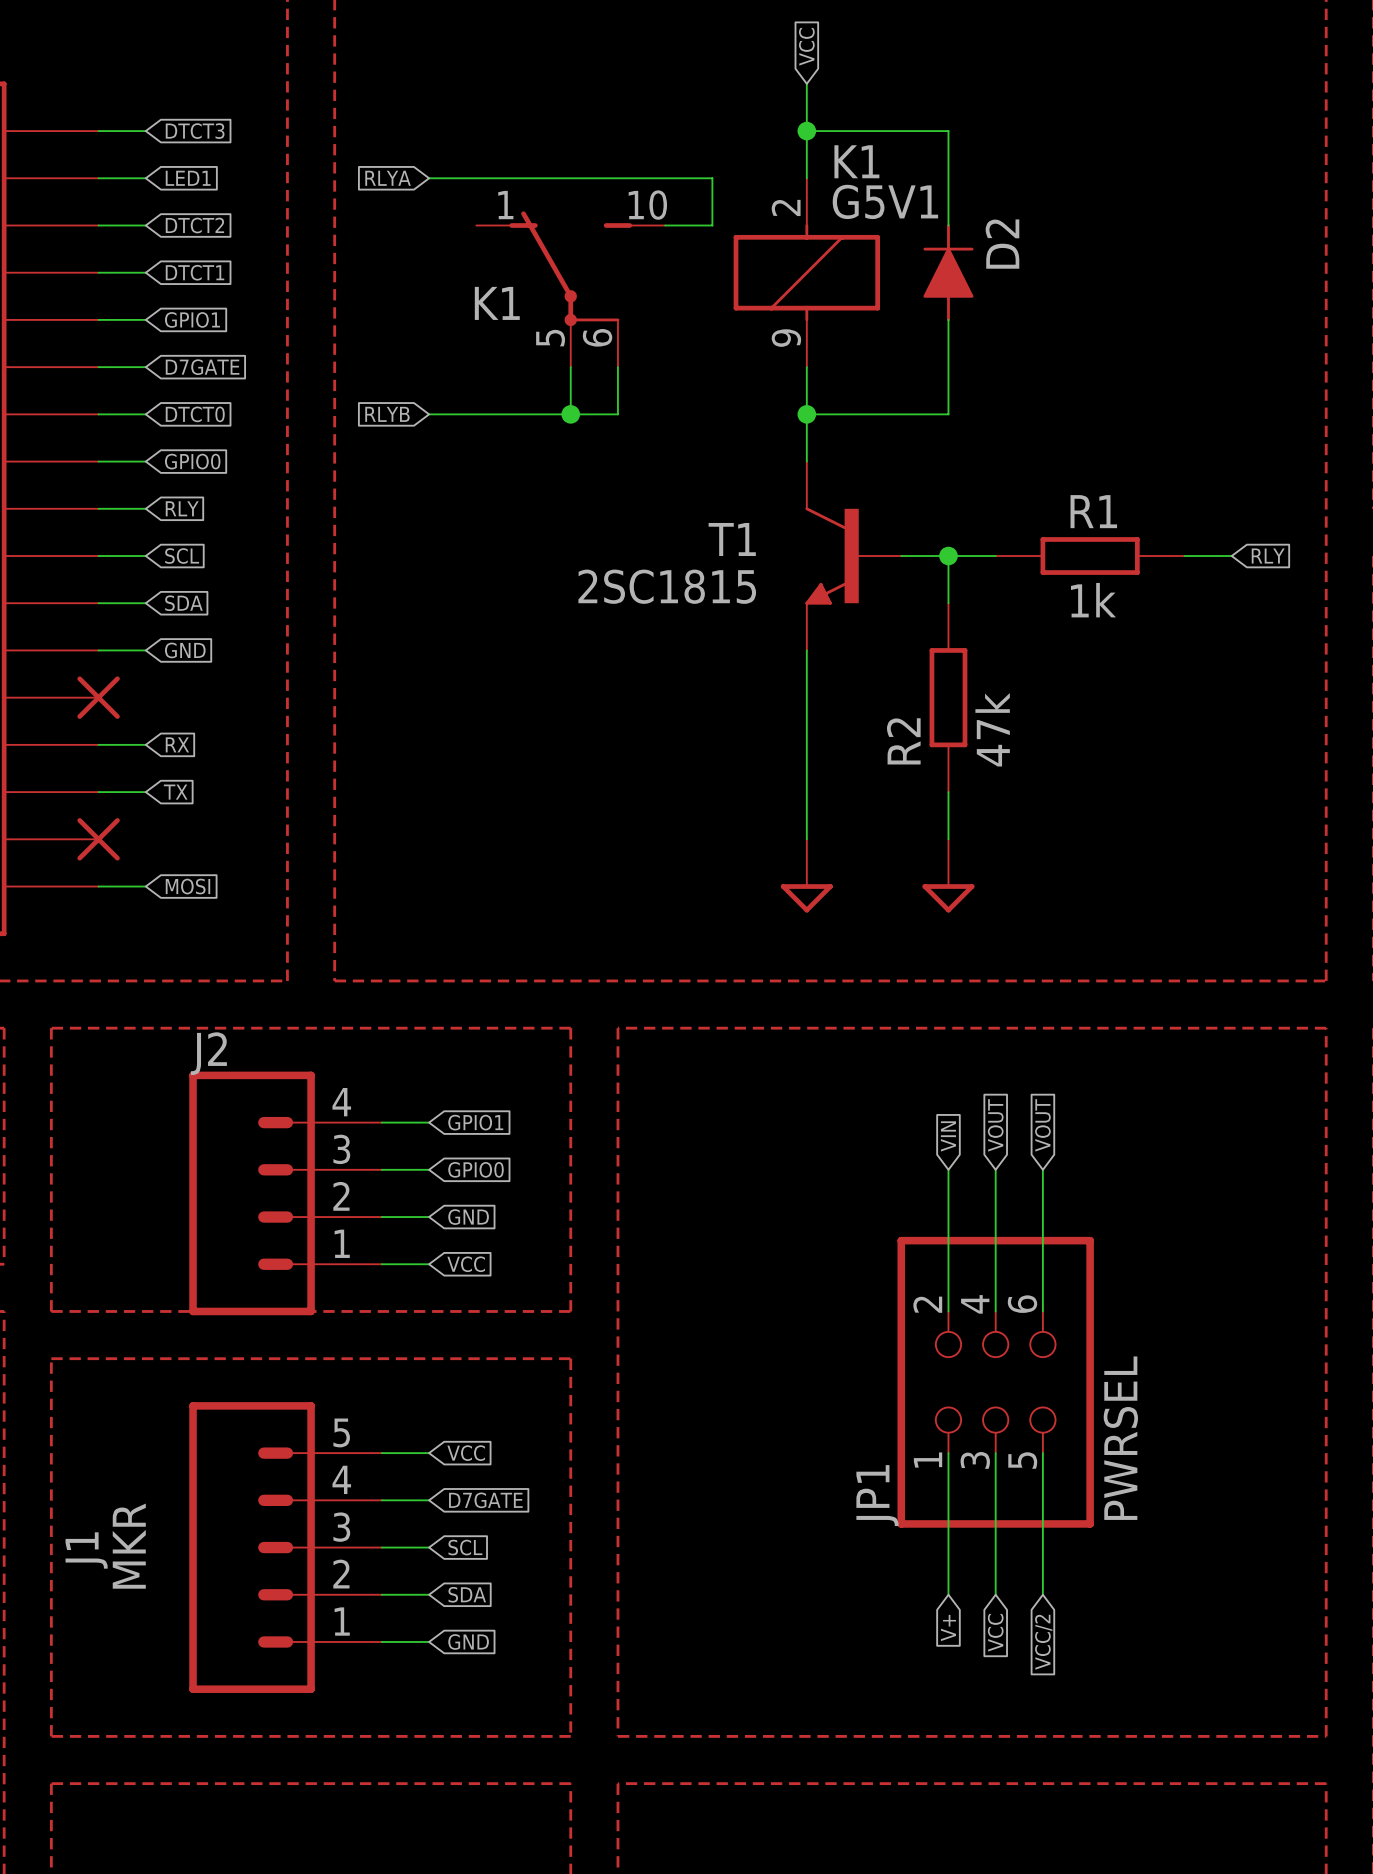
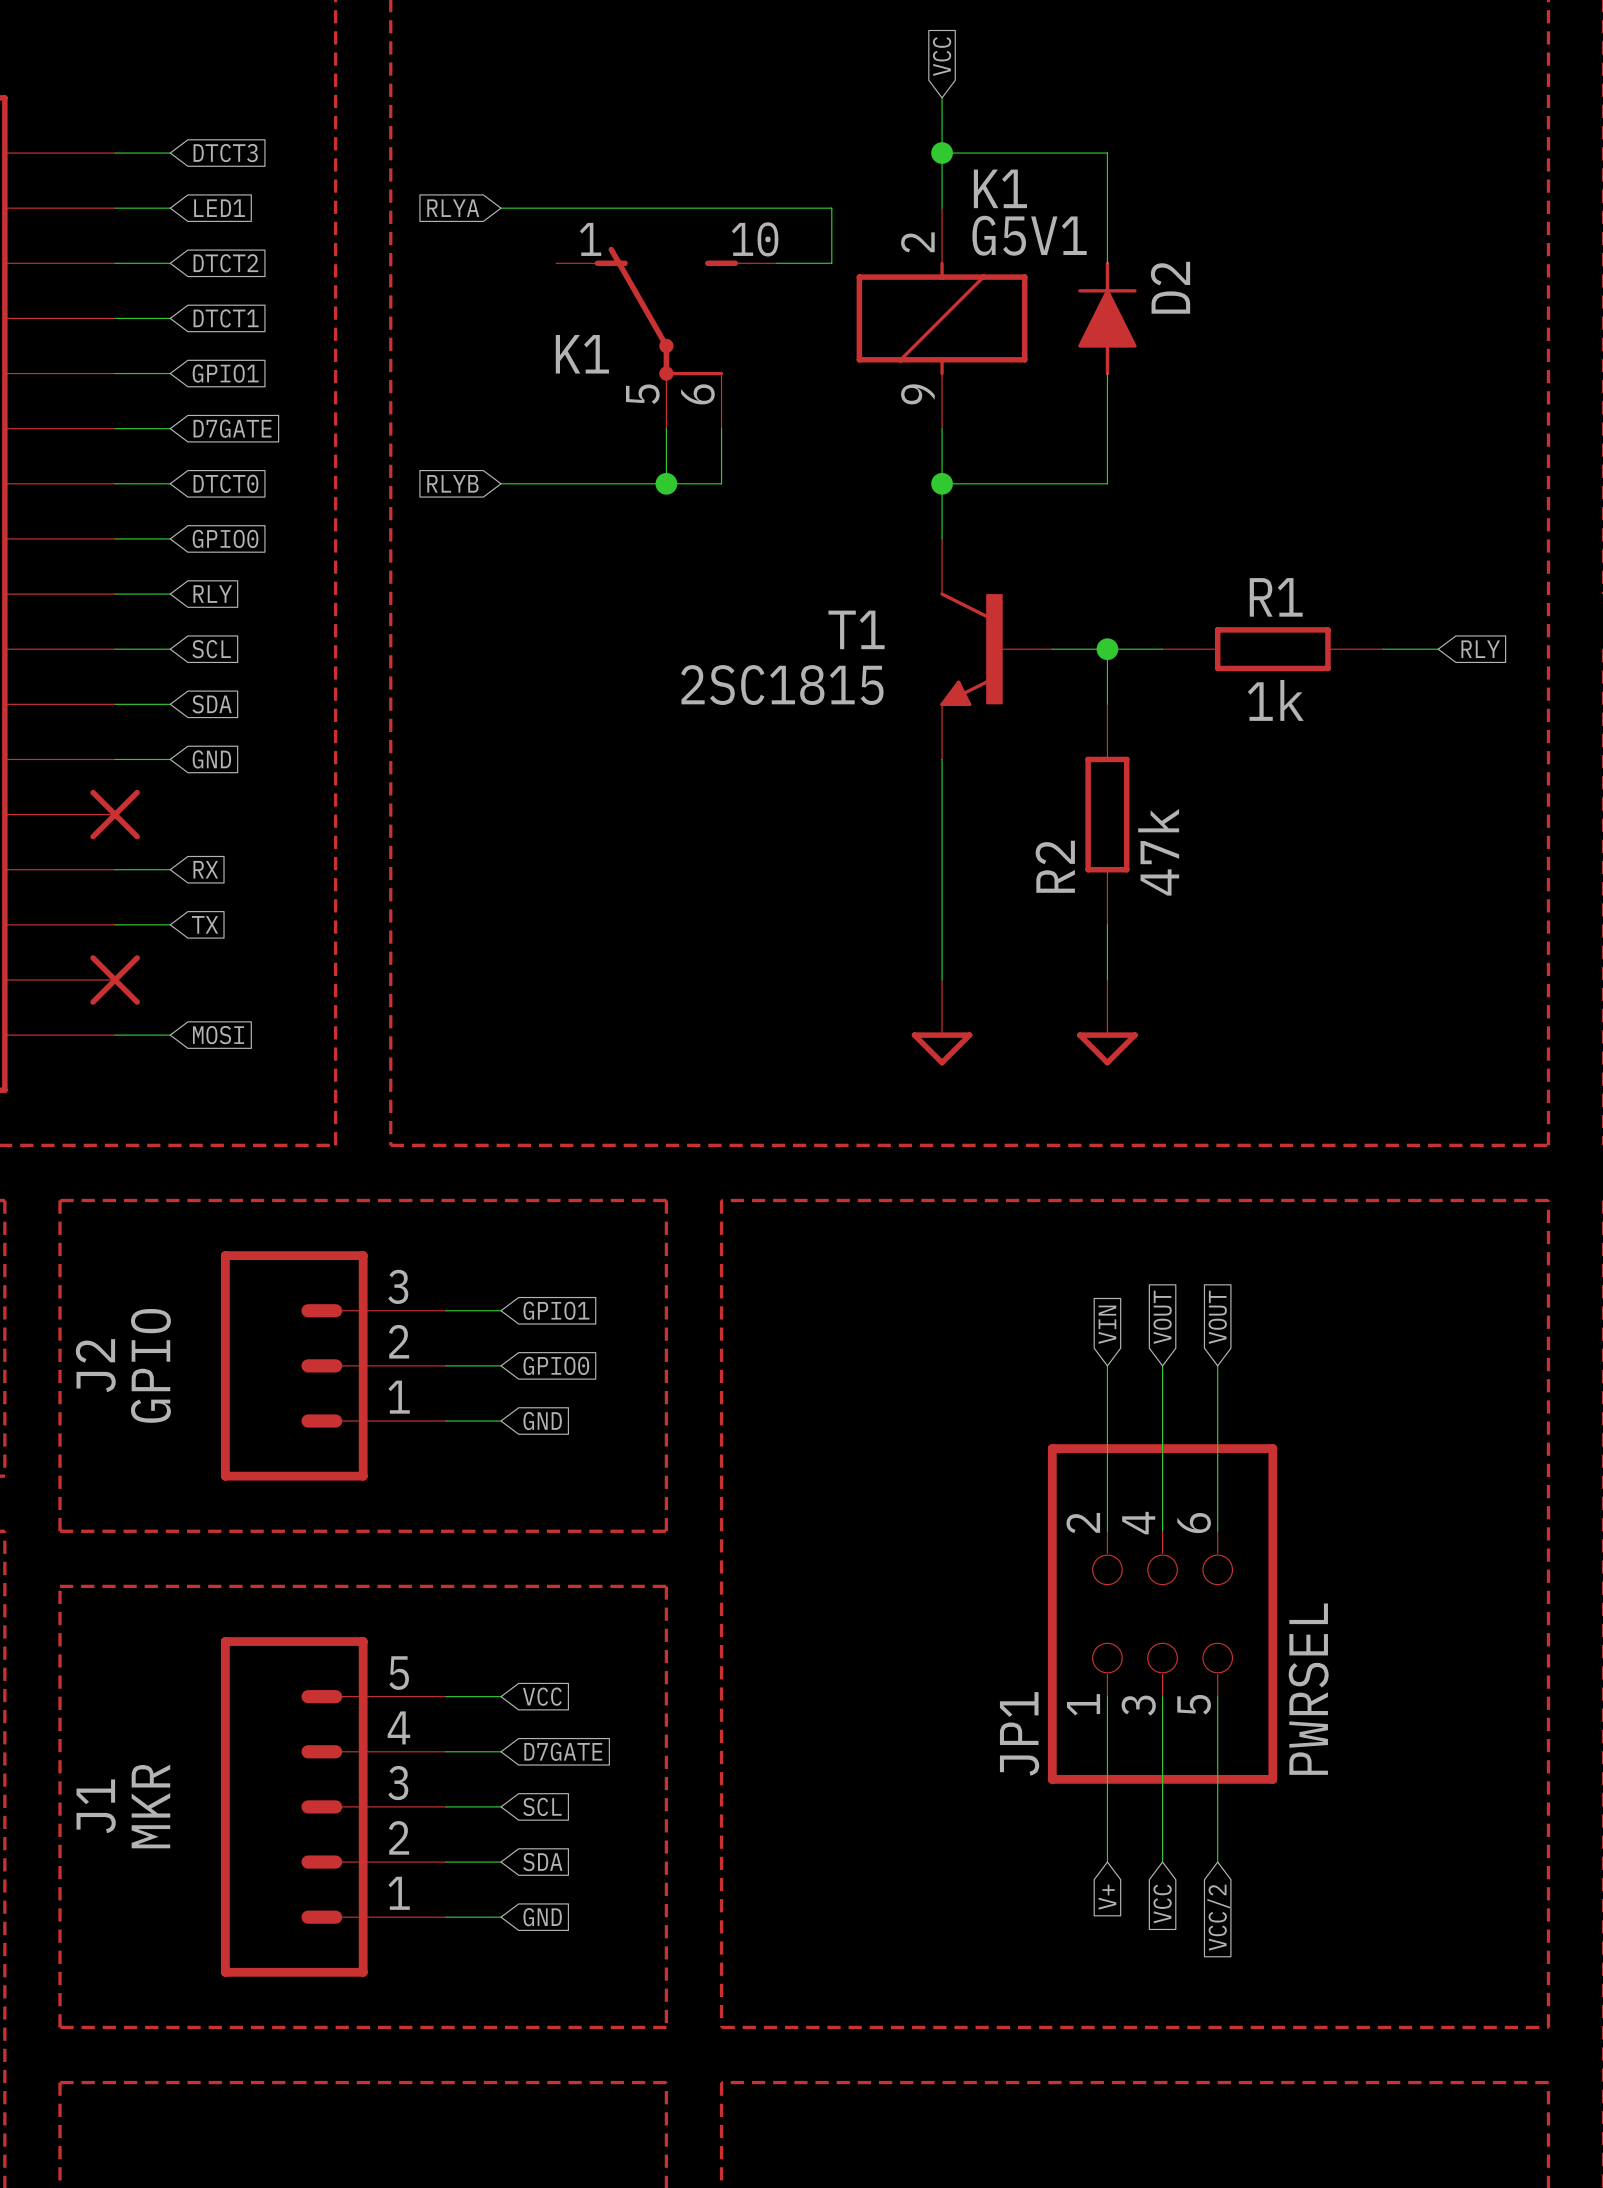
J2 name position: J2 (208, 1053) -> J2 (95, 1365)
J2 symbol: [189, 1071, 382, 1316] -> [220, 1251, 446, 1481]
J2 value: none -> GPIO (150, 1365)
wire: (381, 1264) (429, 1264) -> none
global label: VCC (466, 1264) -> none

